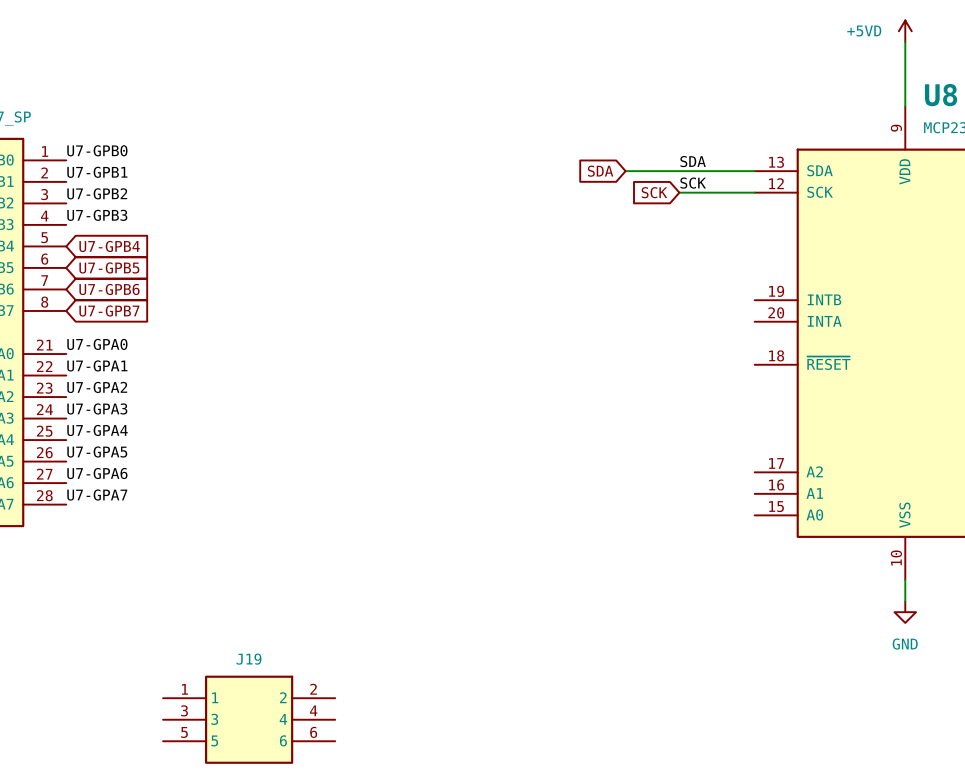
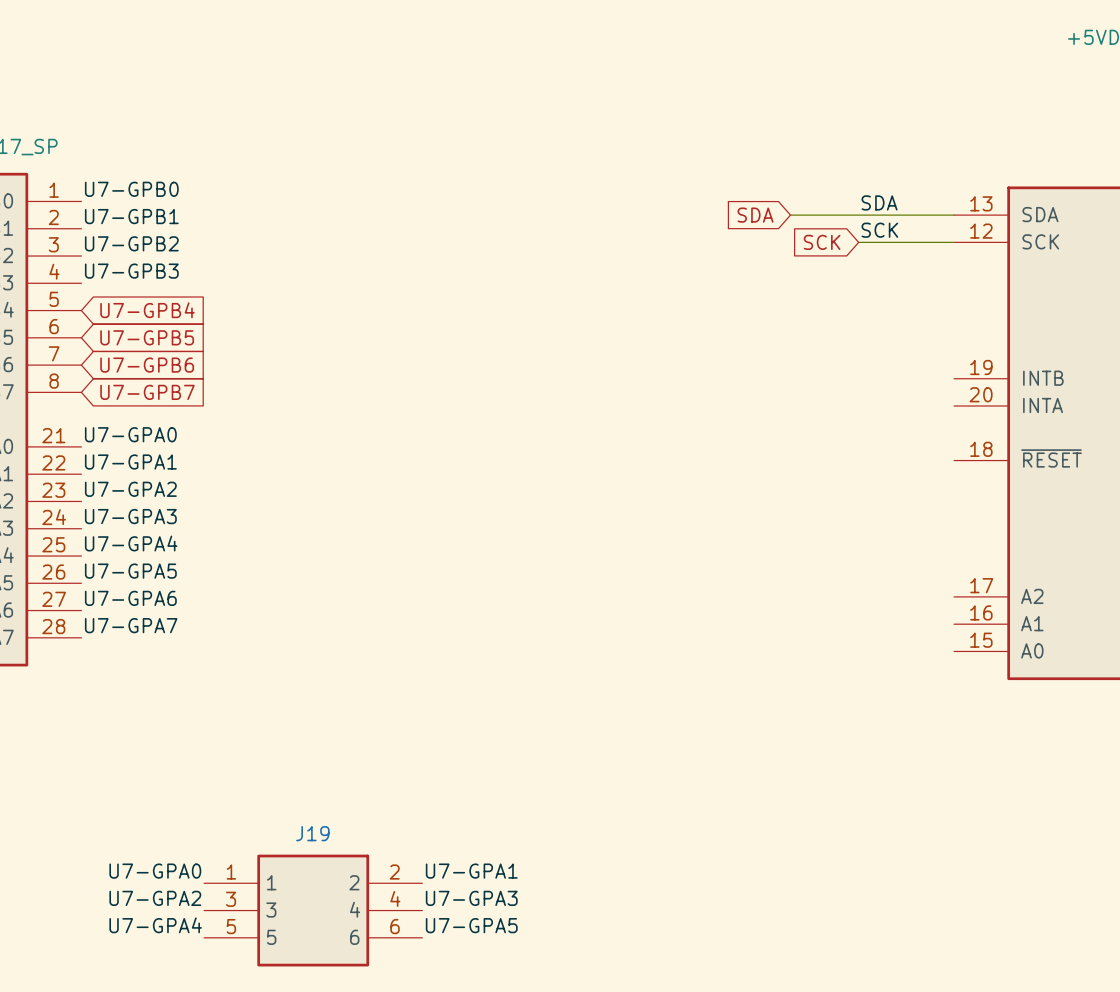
label: none -> U7-GPA0 (155, 871)
label: none -> U7-GPA1 (471, 871)
label: none -> U7-GPA2 (155, 898)
label: none -> U7-GPA3 (471, 898)
label: none -> U7-GPA4 (155, 925)
label: none -> U7-GPA5 (471, 925)

